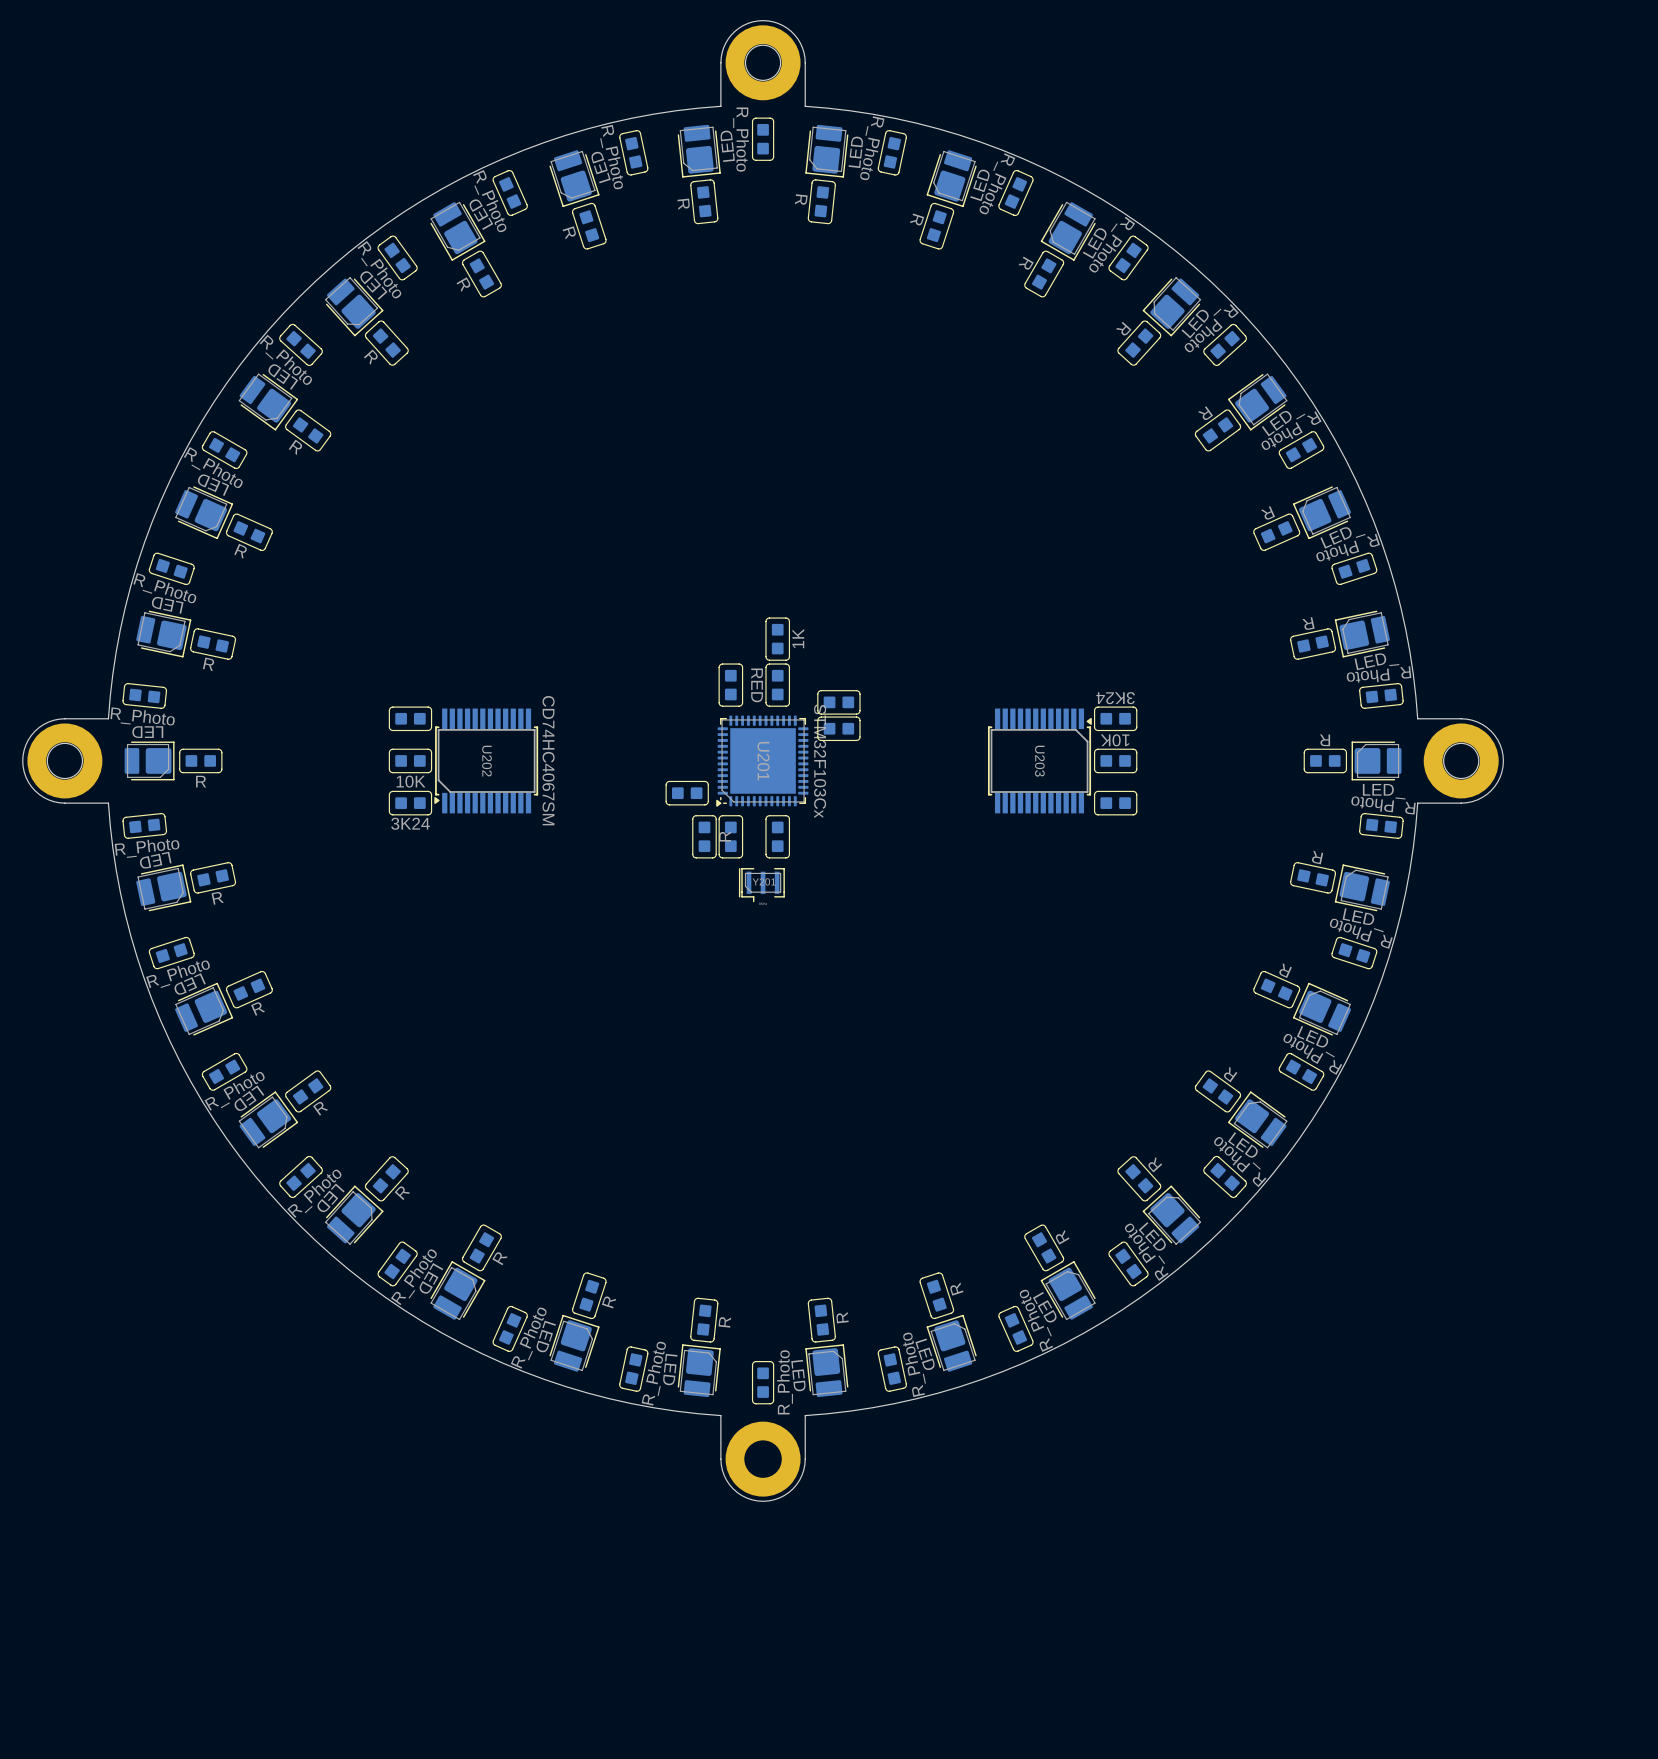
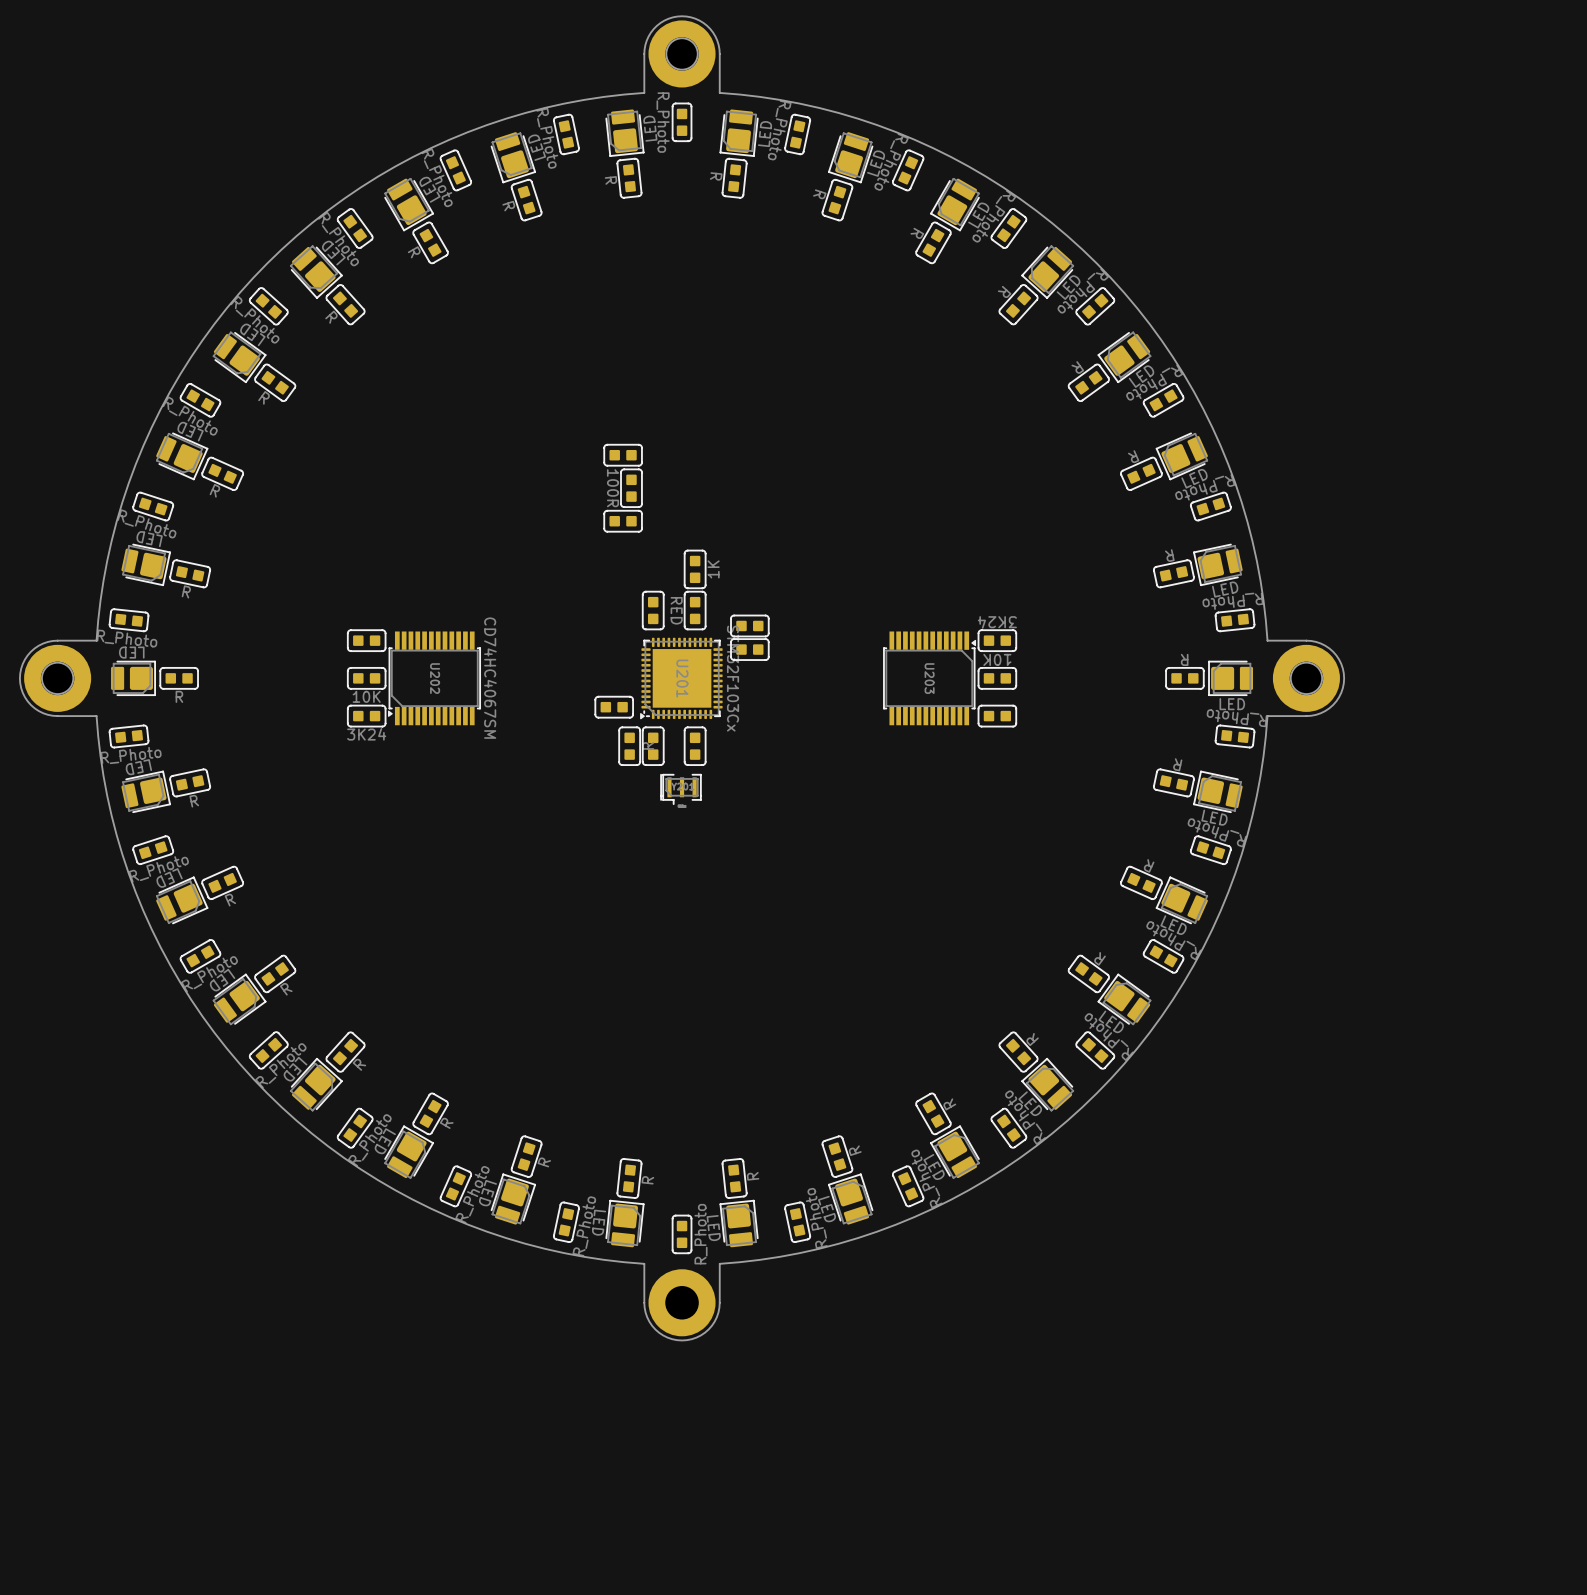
part: none -> (623, 455)
part: none -> 100R (631, 488)
part: none -> (623, 521)

